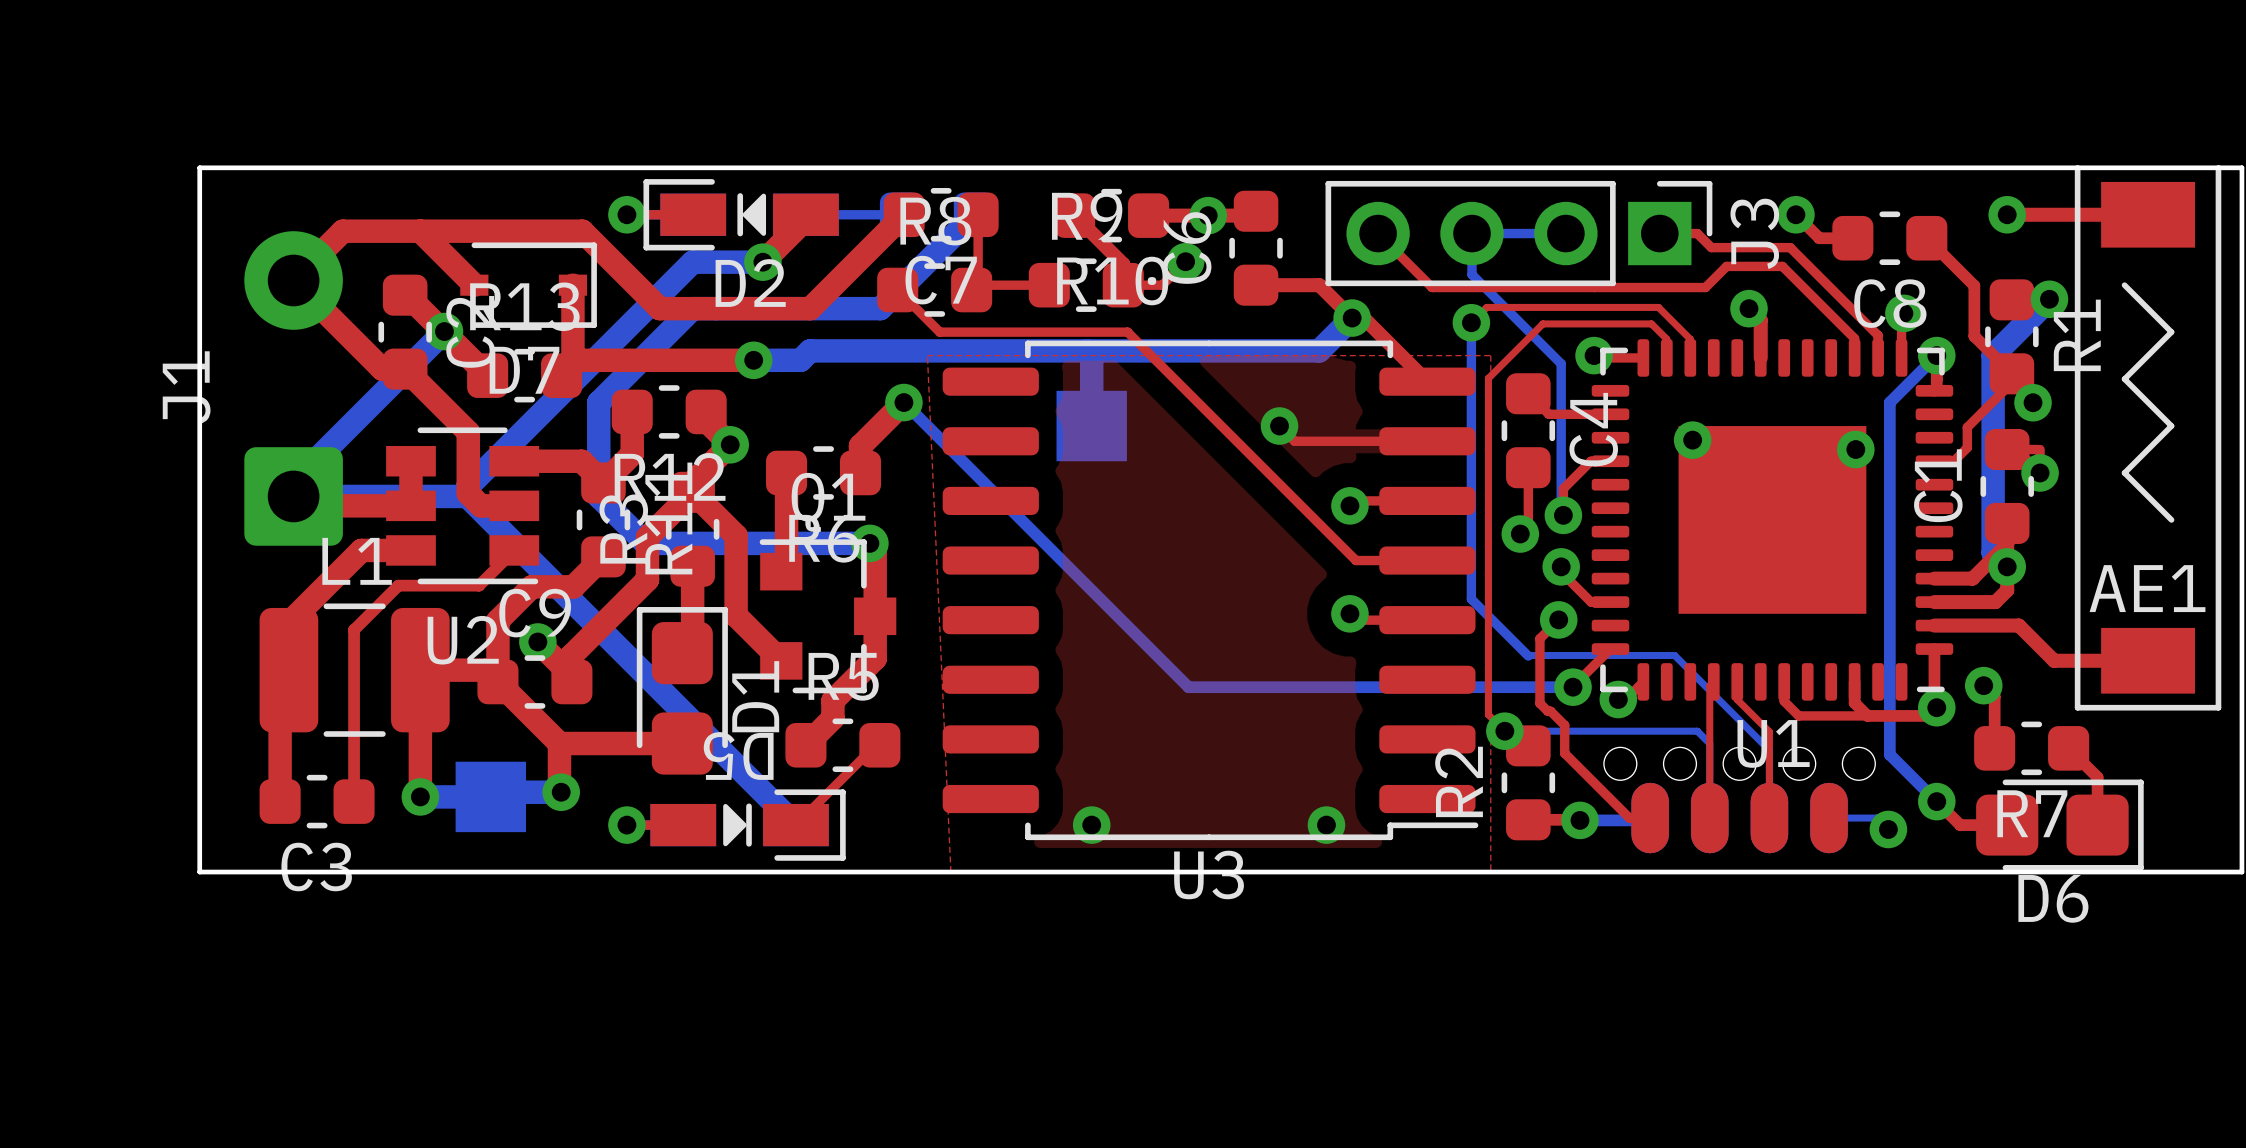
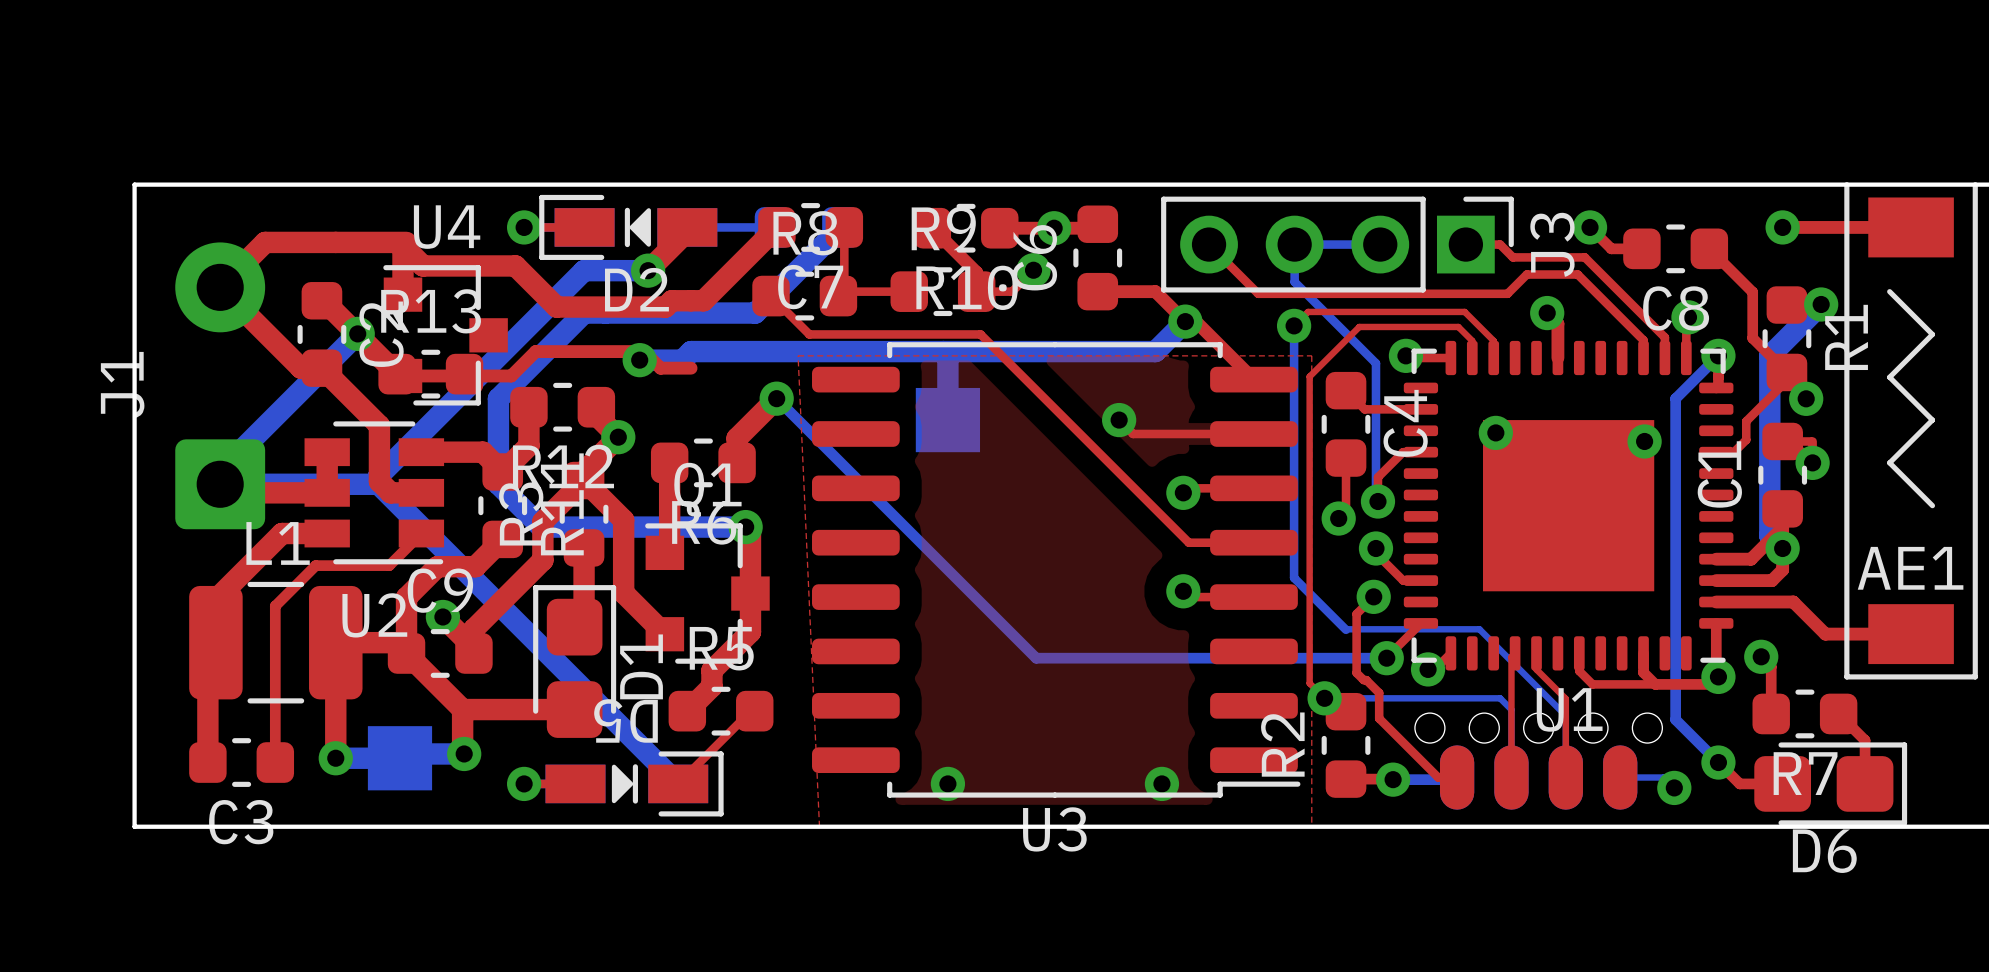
top track: (420, 231) (474, 285) -> none
top track: (497, 231) (582, 231) (659, 308) (810, 308) (823, 295) -> (402, 294) (402, 245) (423, 265) (515, 265) (556, 307) (665, 307) (671, 300) (703, 300)
D7: (528, 285) -> none
top track: (572, 285) (572, 364) -> none
U4: none -> (445, 335)
top track: (753, 360) (576, 360) (561, 375) -> none
top track: none -> (691, 368) (660, 368) (643, 351) (535, 351) (511, 375) (402, 375)

